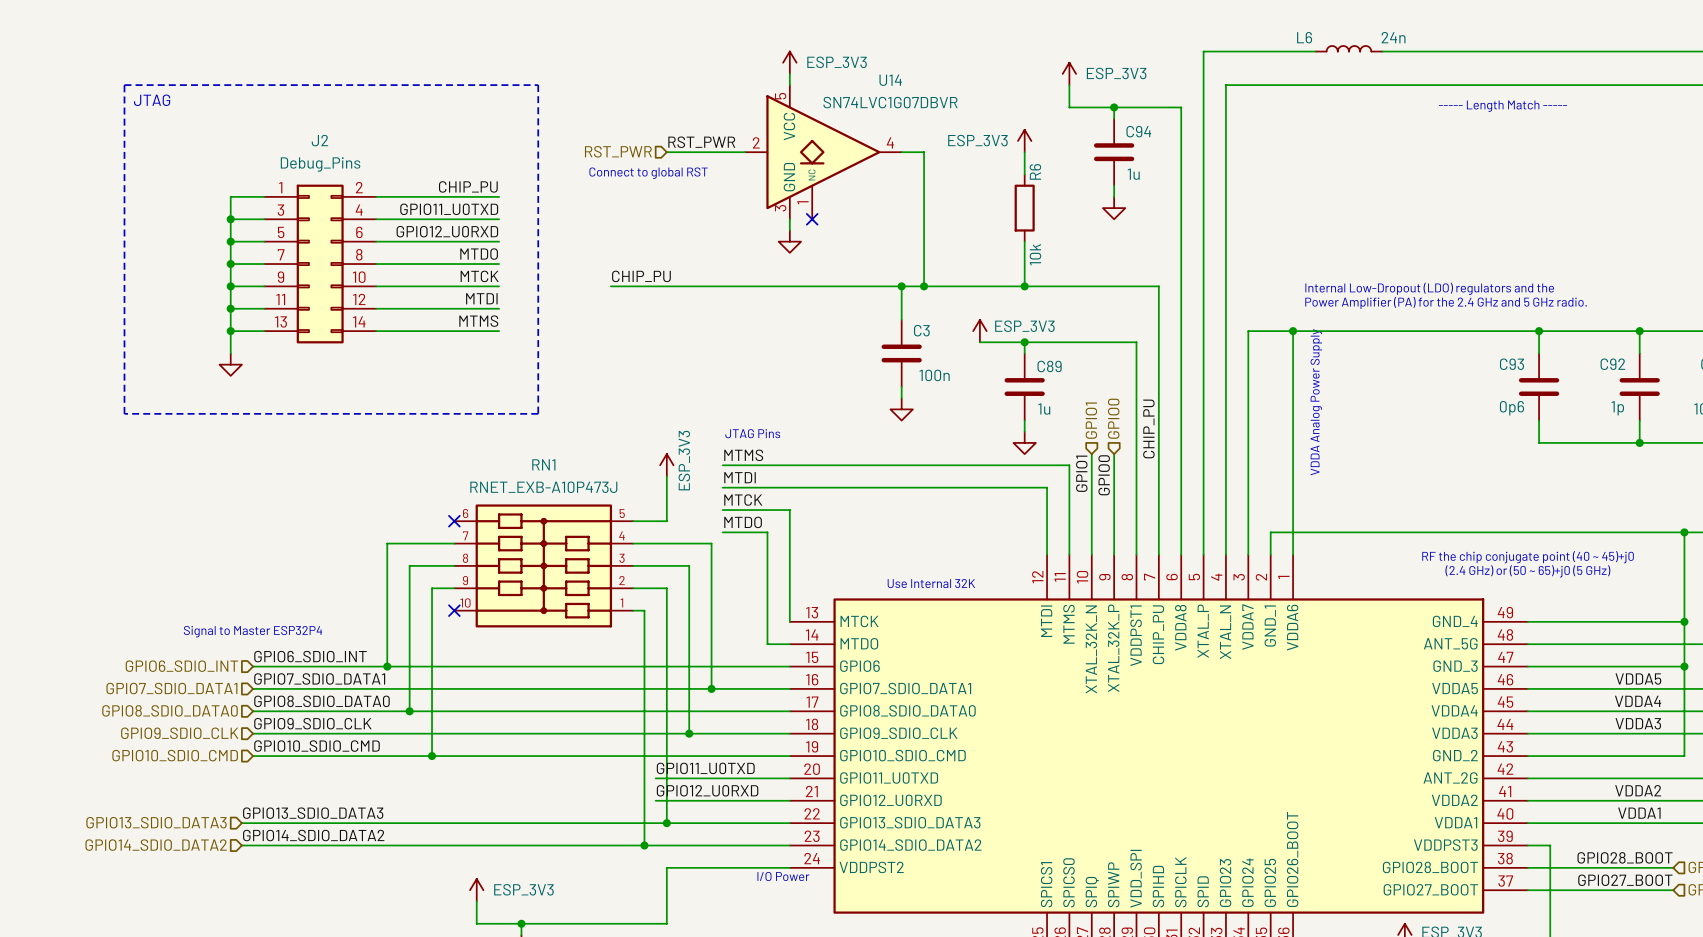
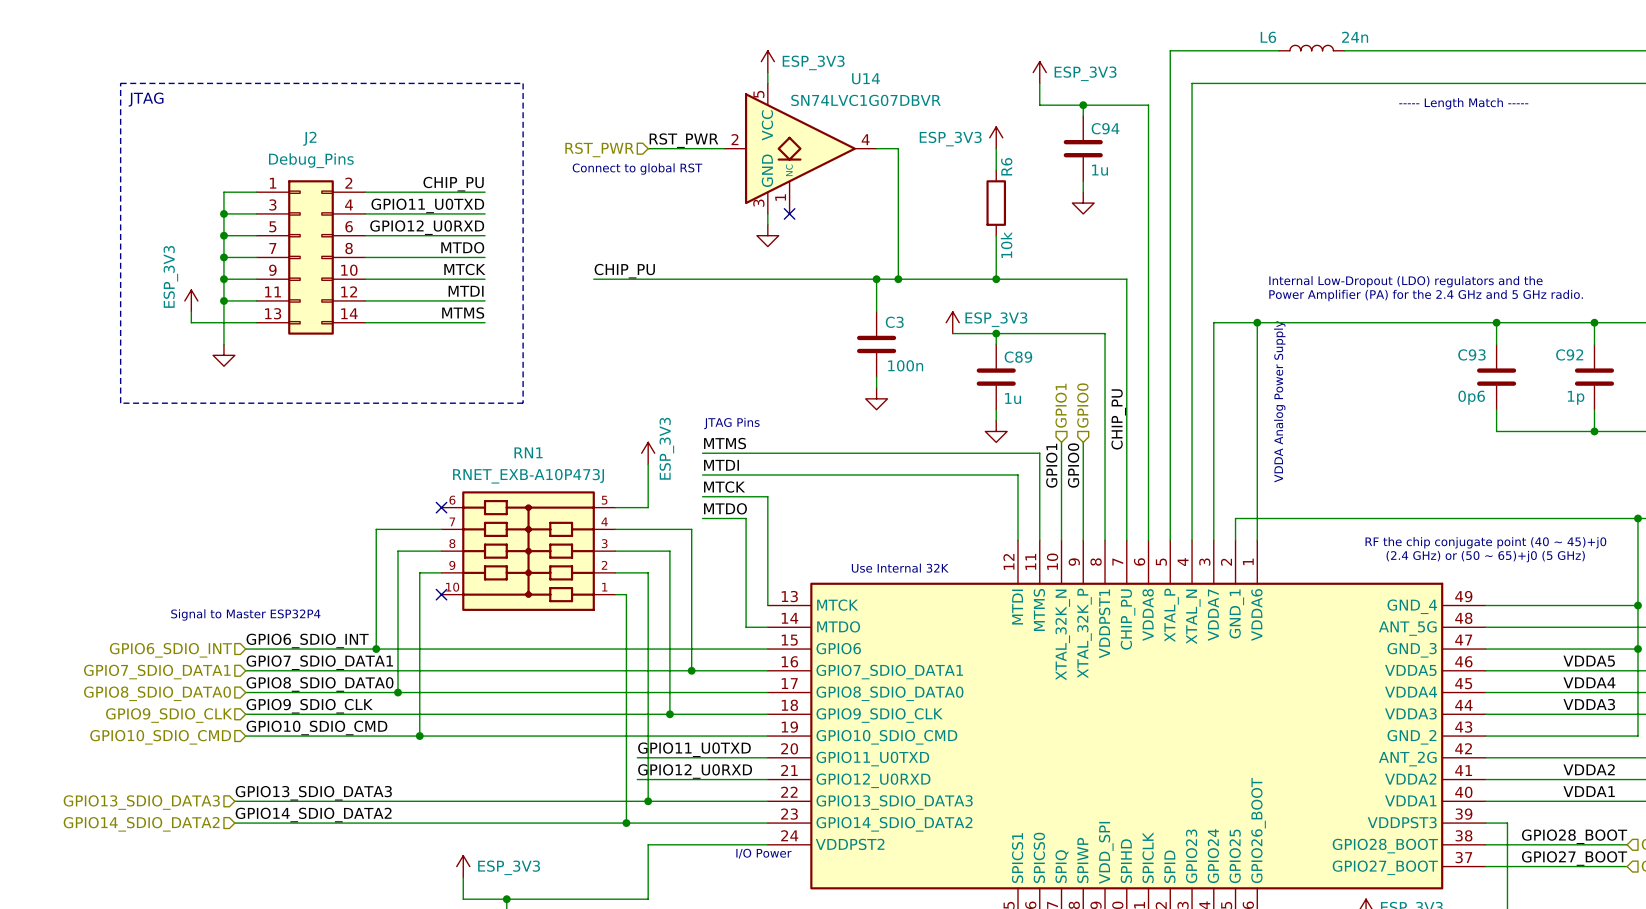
power symbol: none -> ESP_3V3 (191, 300)
wire: none -> (191, 311) (191, 322) (223, 322)
junction: (230, 331) -> none

